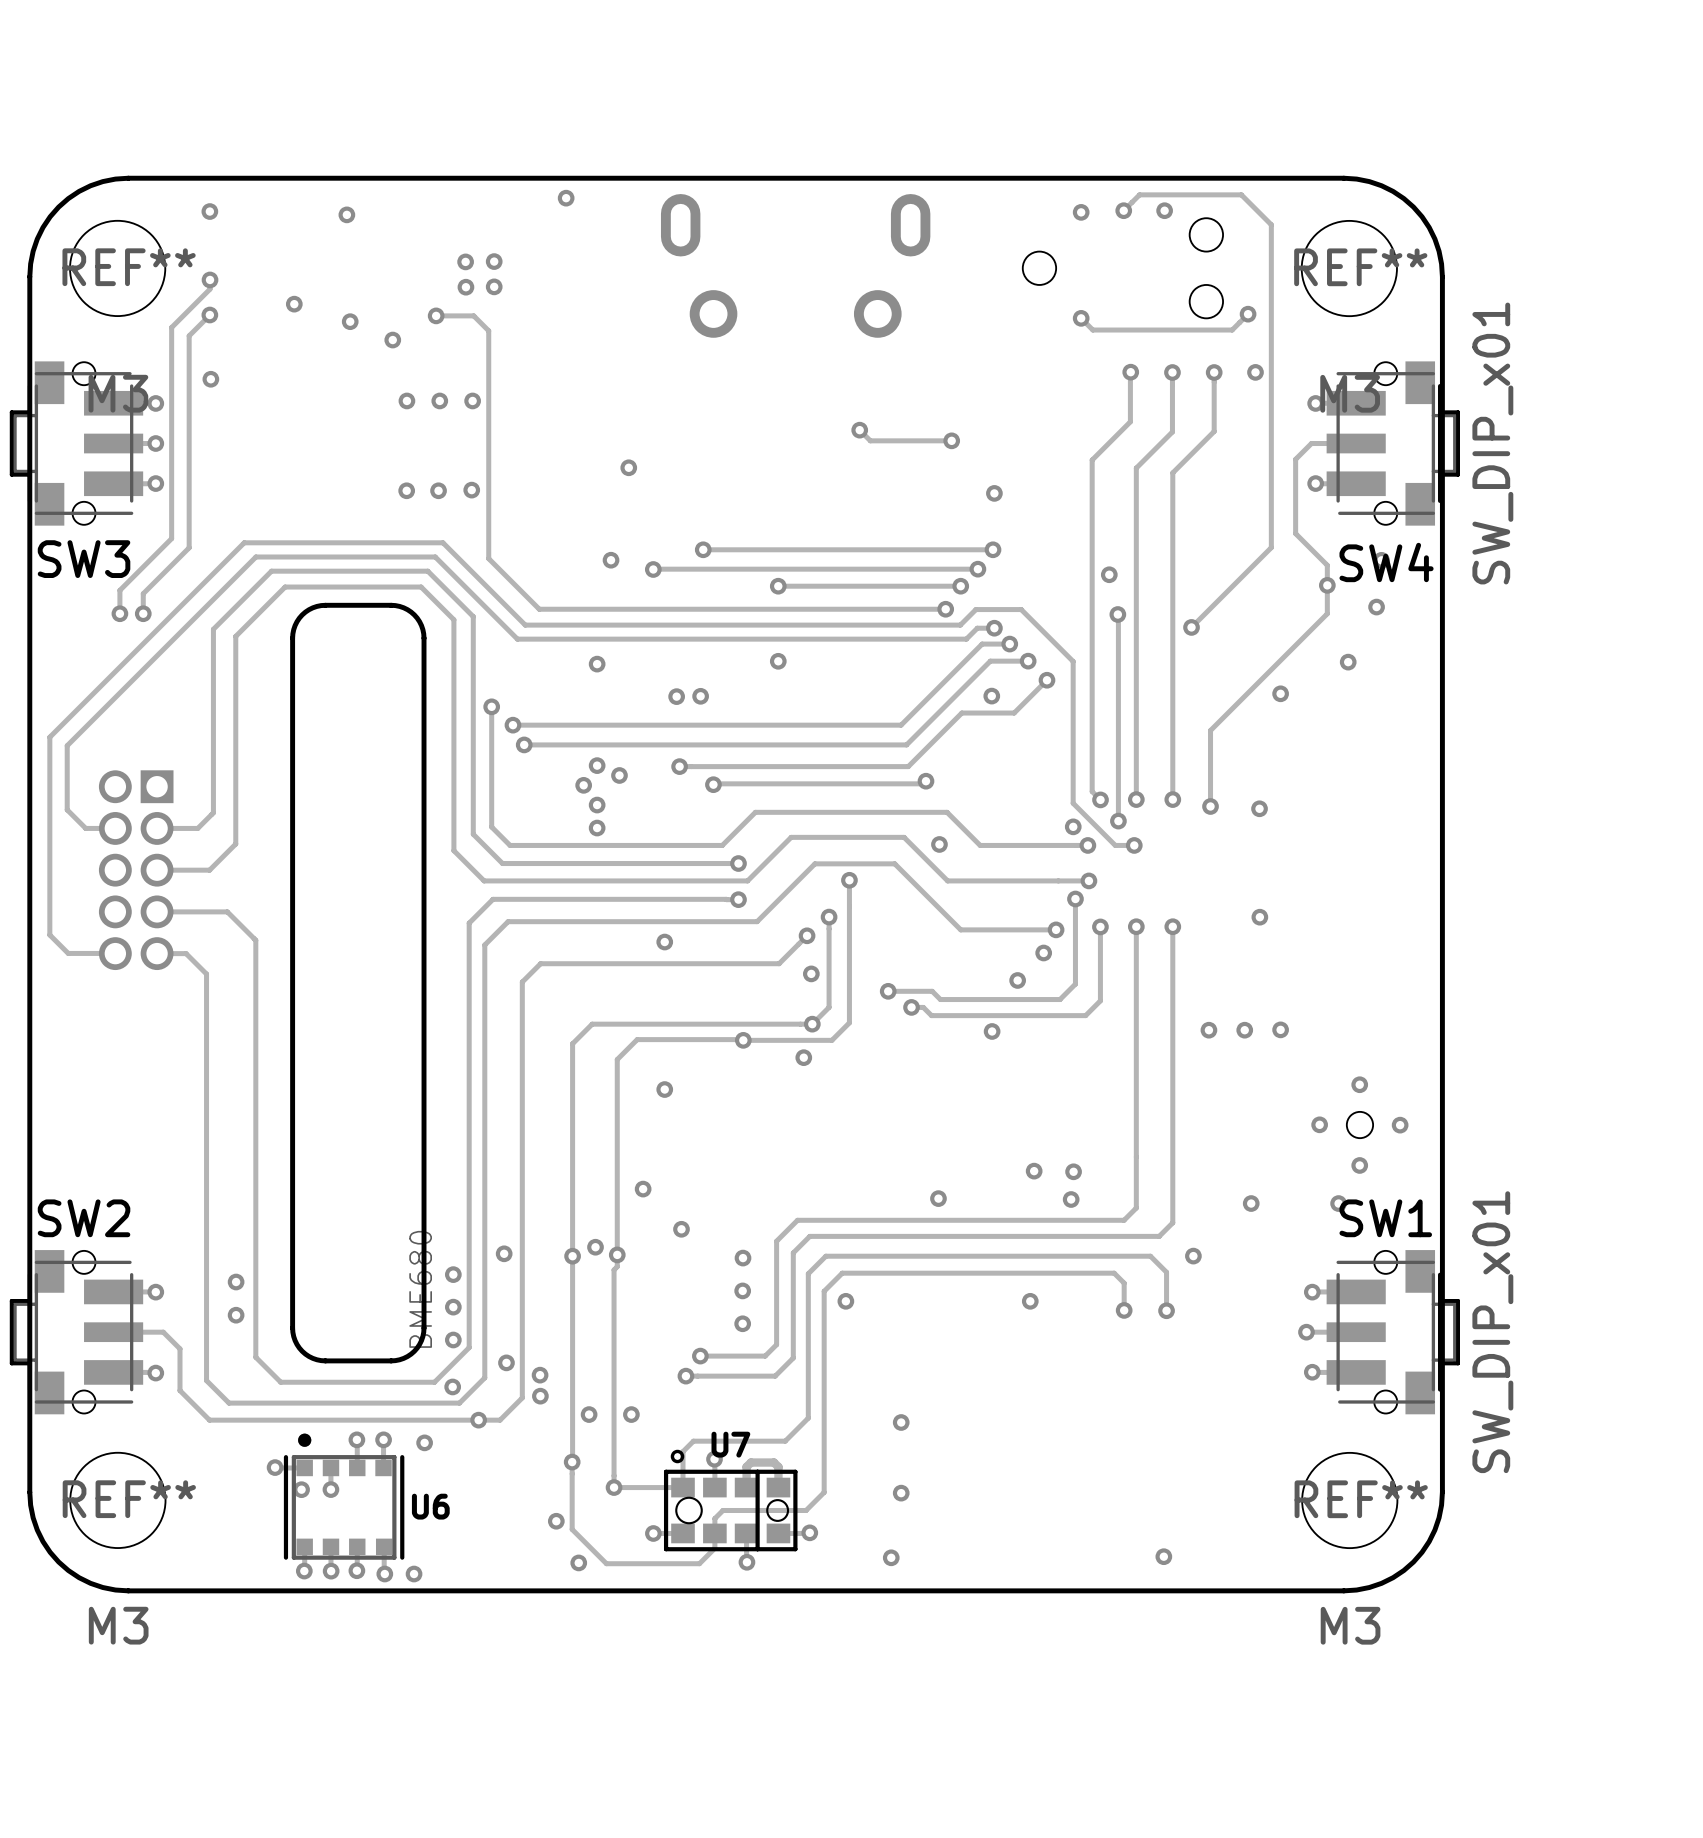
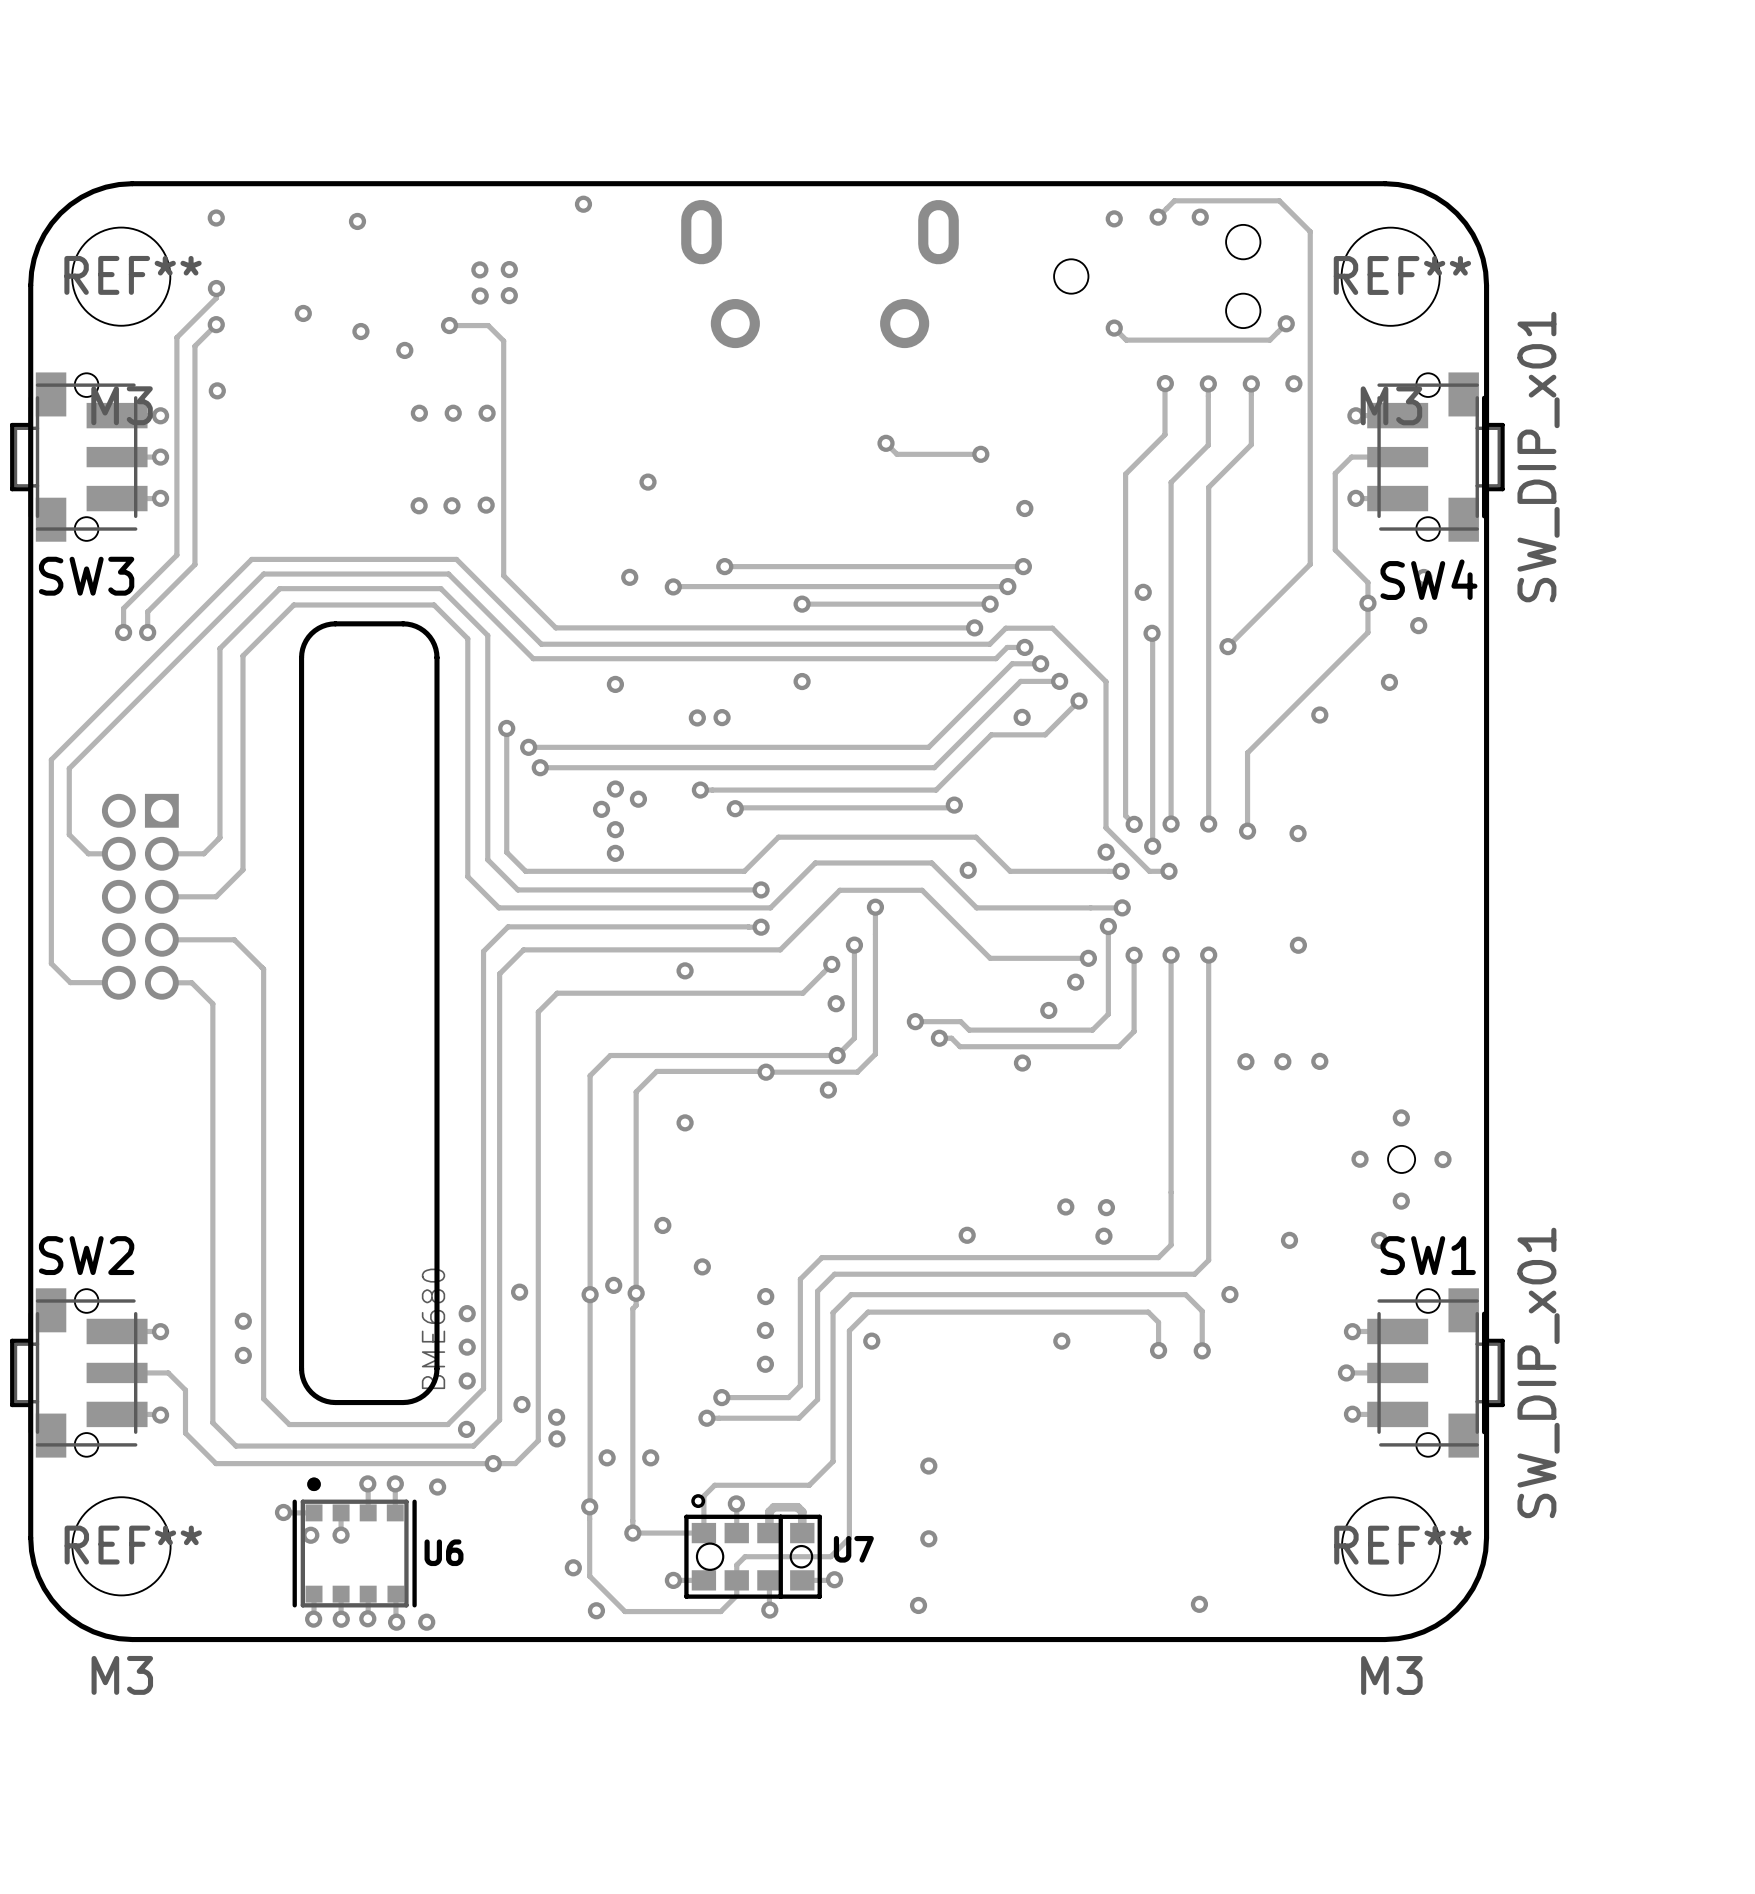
U7 name position: U7 (730, 1444) -> U7 (853, 1549)

